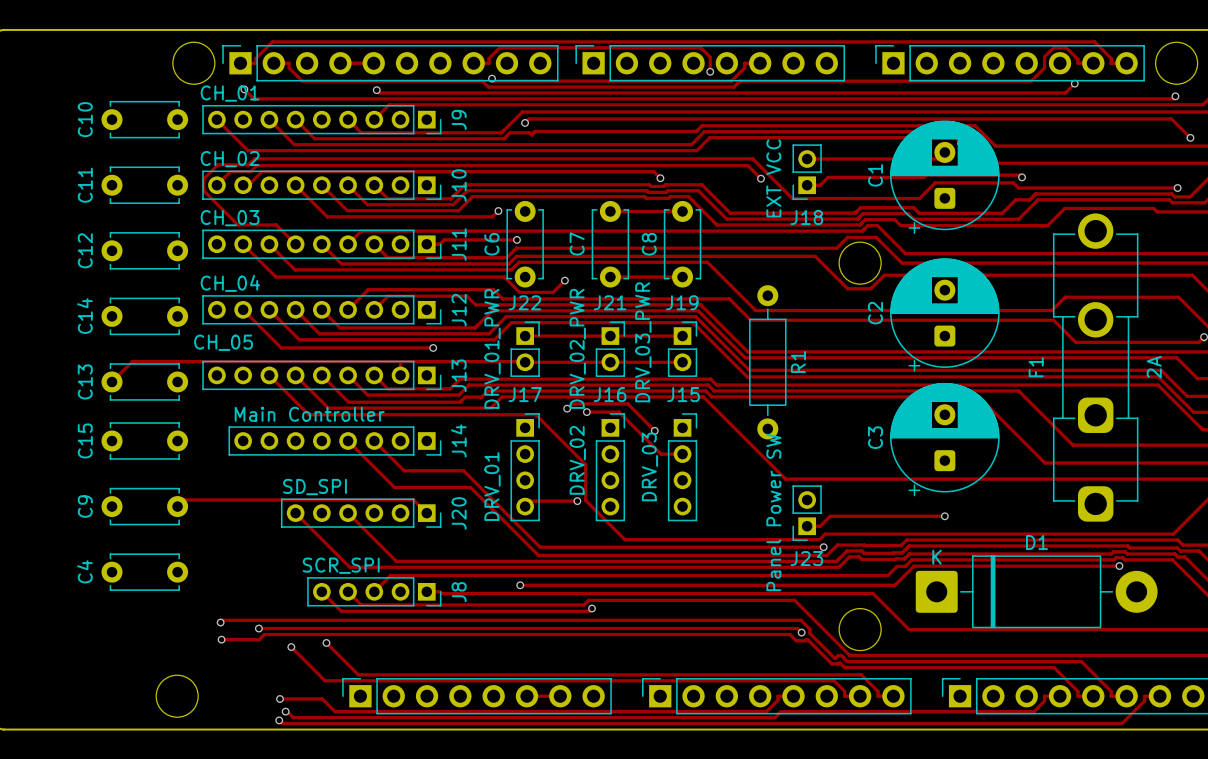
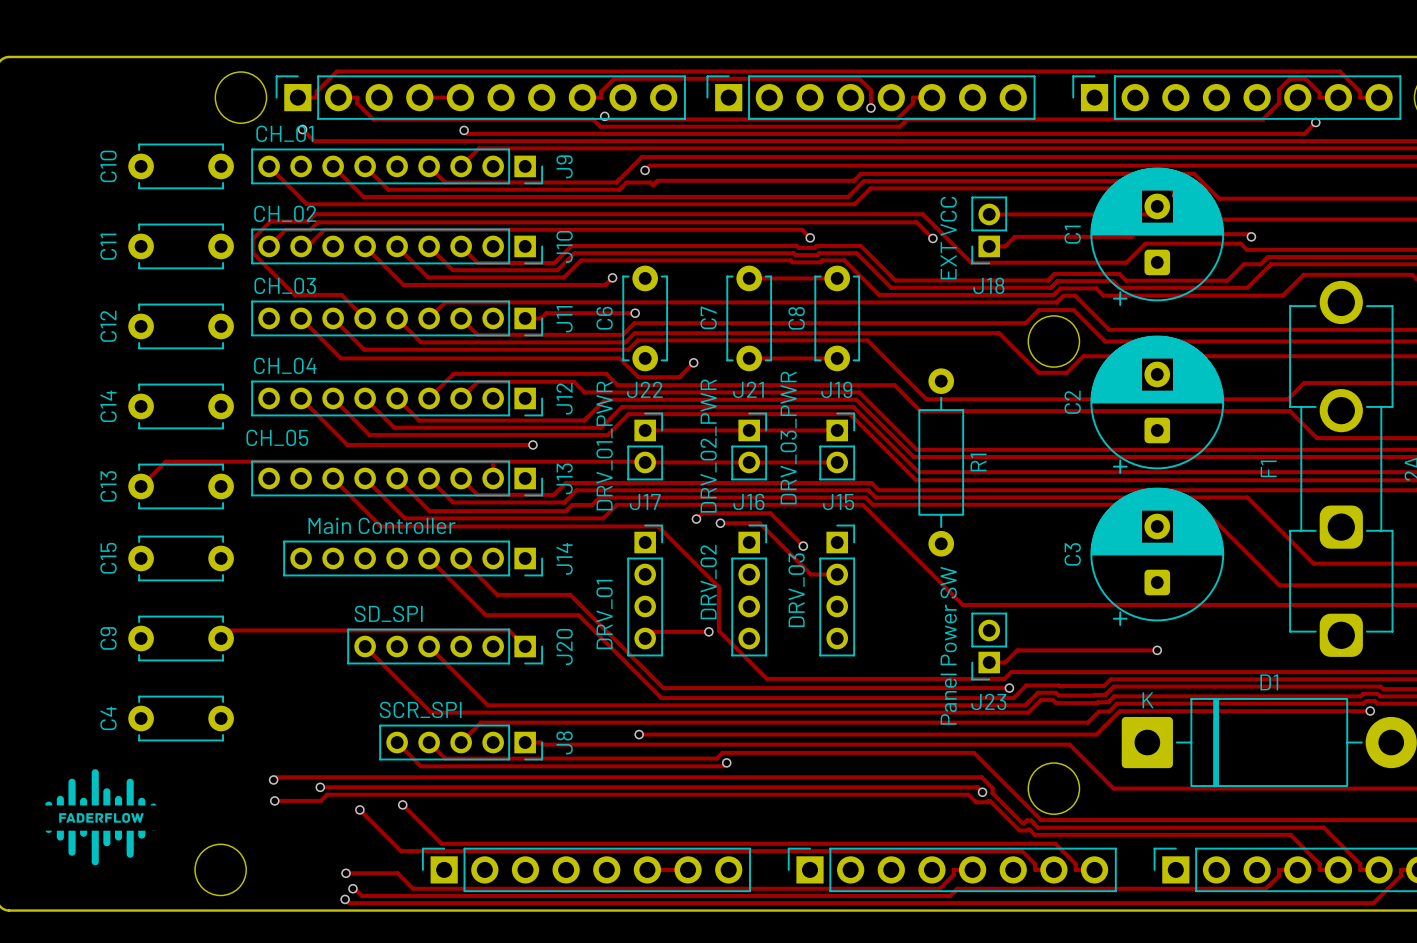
drawing: none -> [45, 769, 157, 866]

